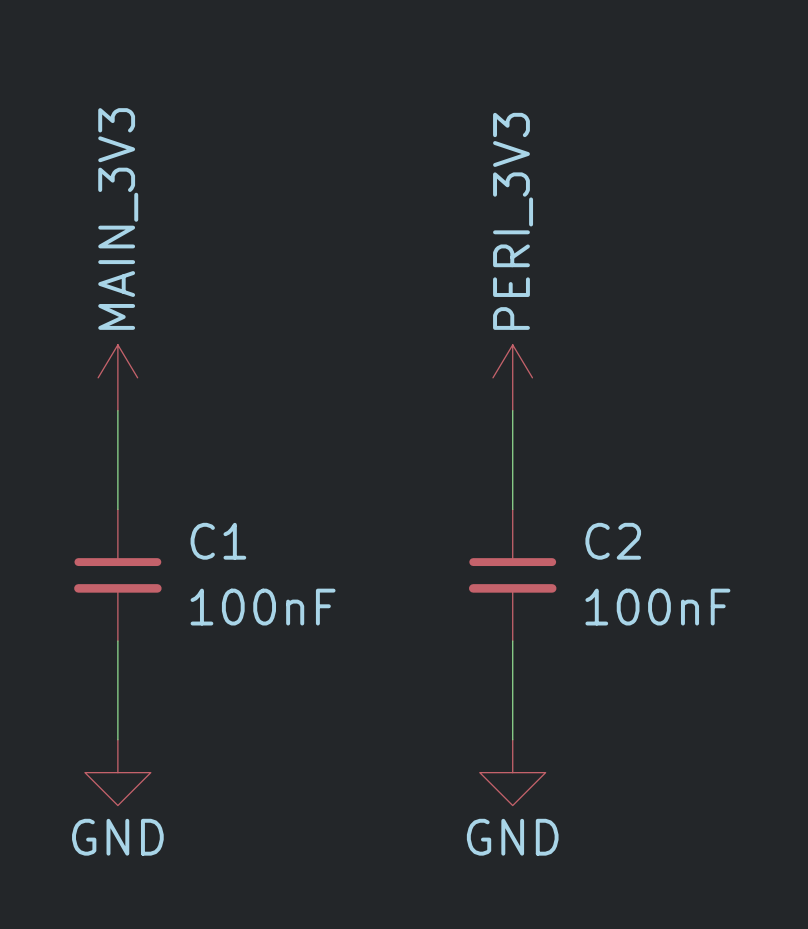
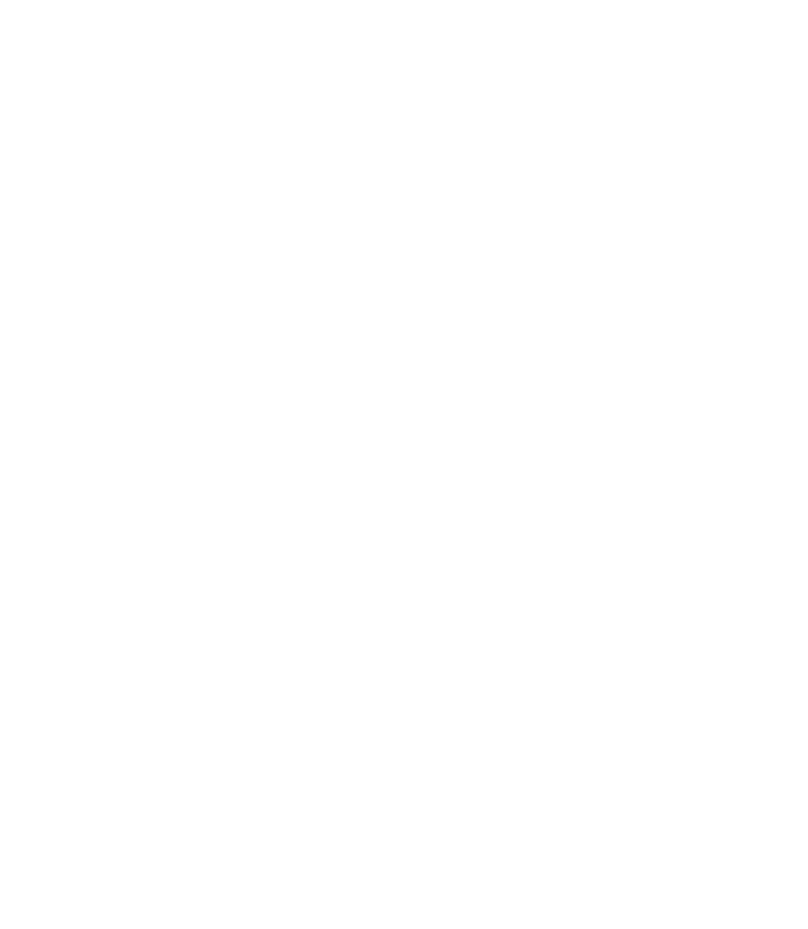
power symbol: MAIN_3V3 (117, 377) -> none
power symbol: PERI_3V3 (512, 377) -> none
wire: (117, 410) (117, 509) -> none
wire: (512, 410) (512, 509) -> none
C1: 100nF (117, 575) -> none
C2: 100nF (512, 575) -> none
wire: (117, 641) (117, 739) -> none
wire: (512, 641) (512, 739) -> none
power symbol: GND (117, 772) -> none
power symbol: GND (512, 772) -> none

